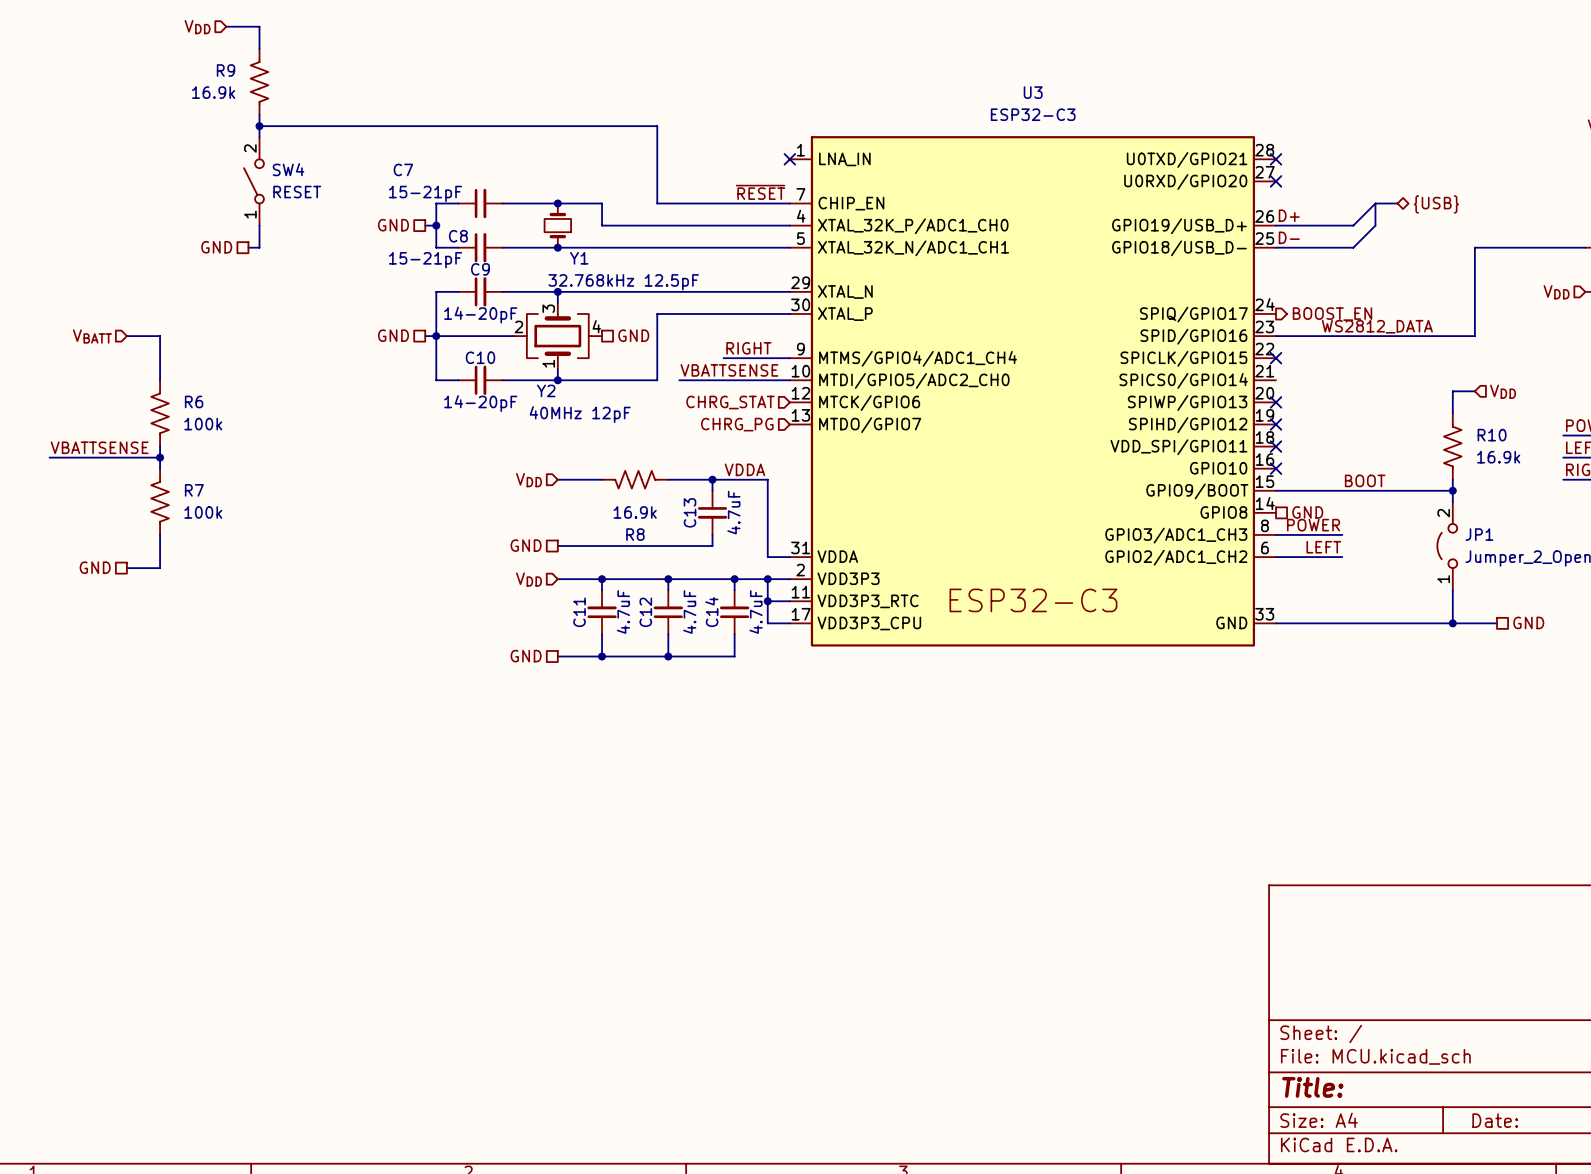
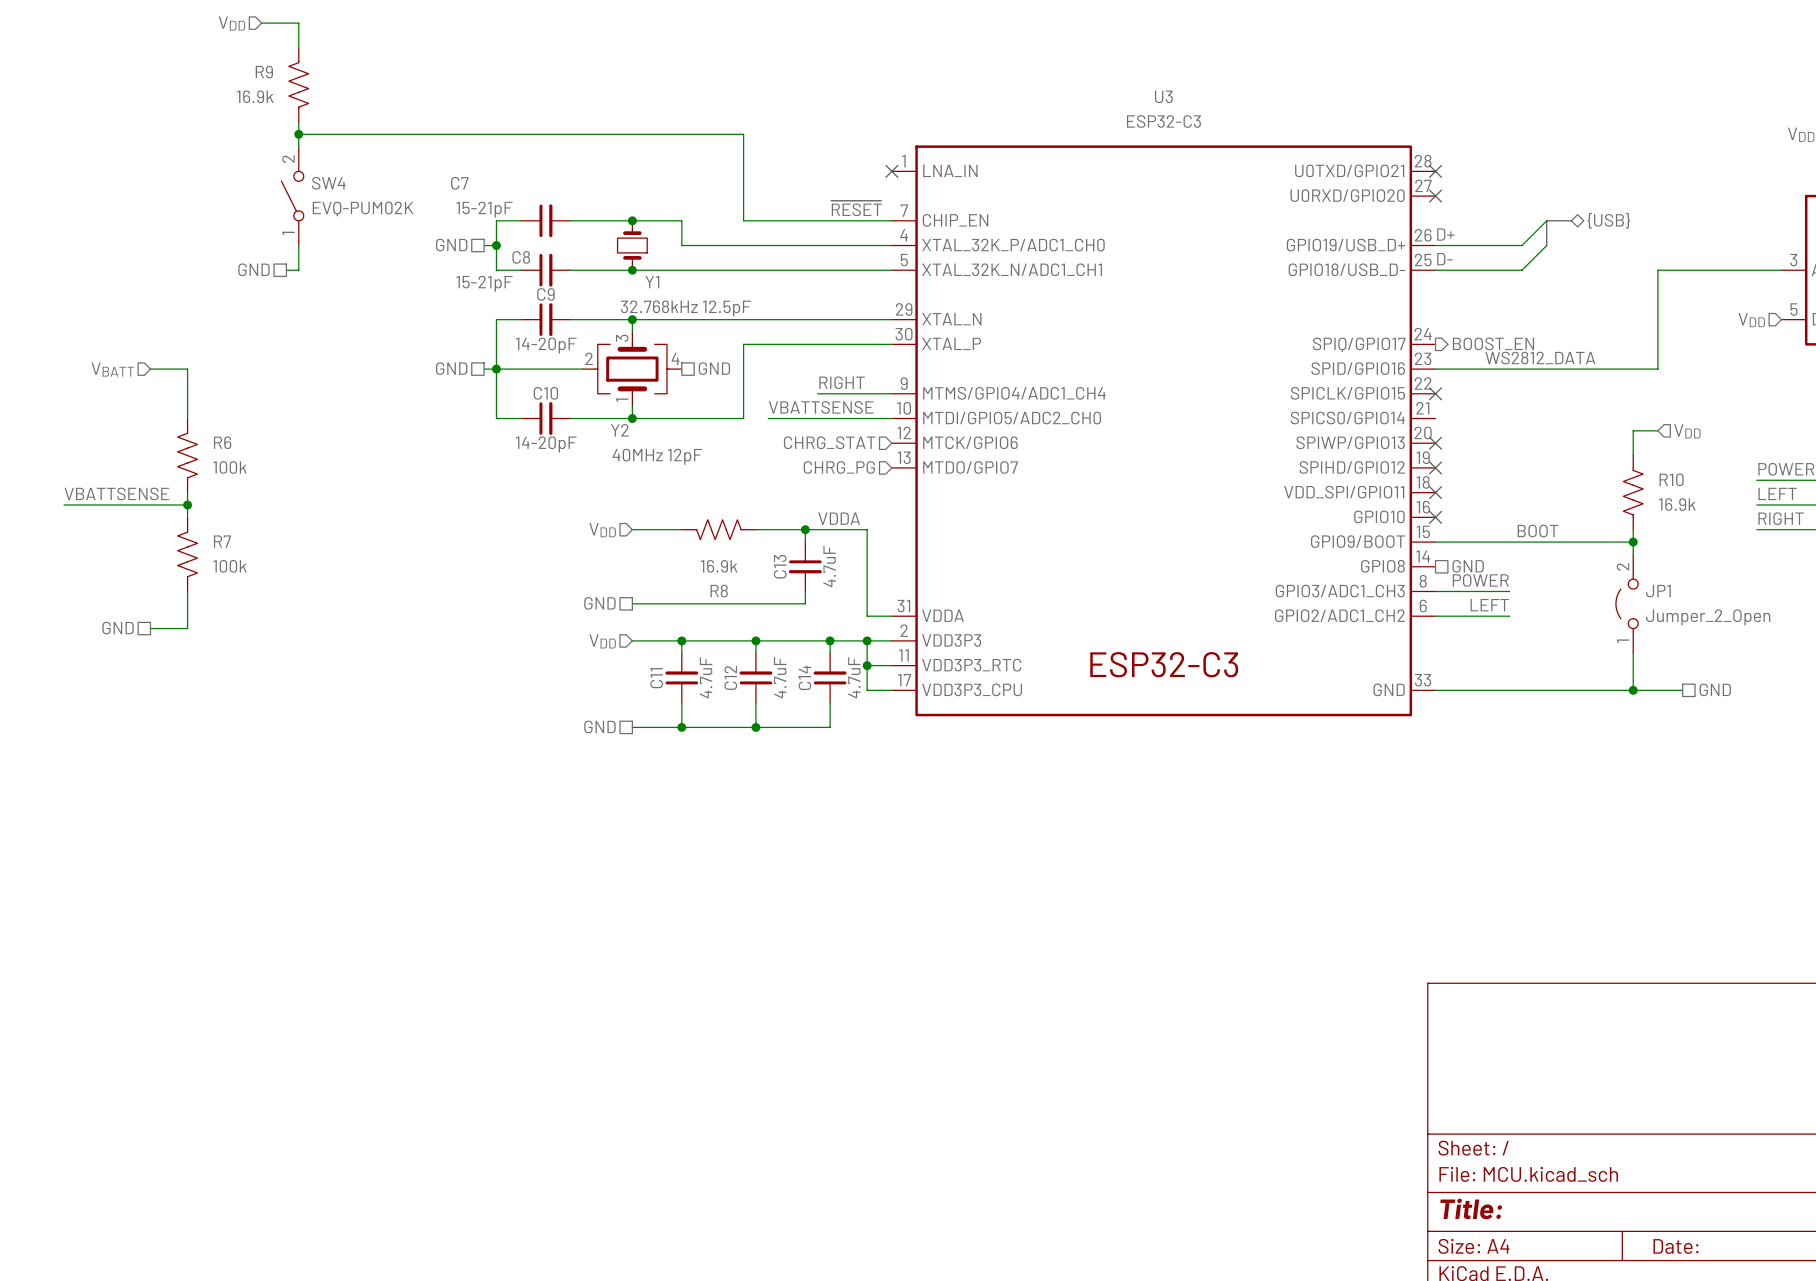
SW4 value: RESET (297, 192) -> EVQ-PUM02K (363, 208)

